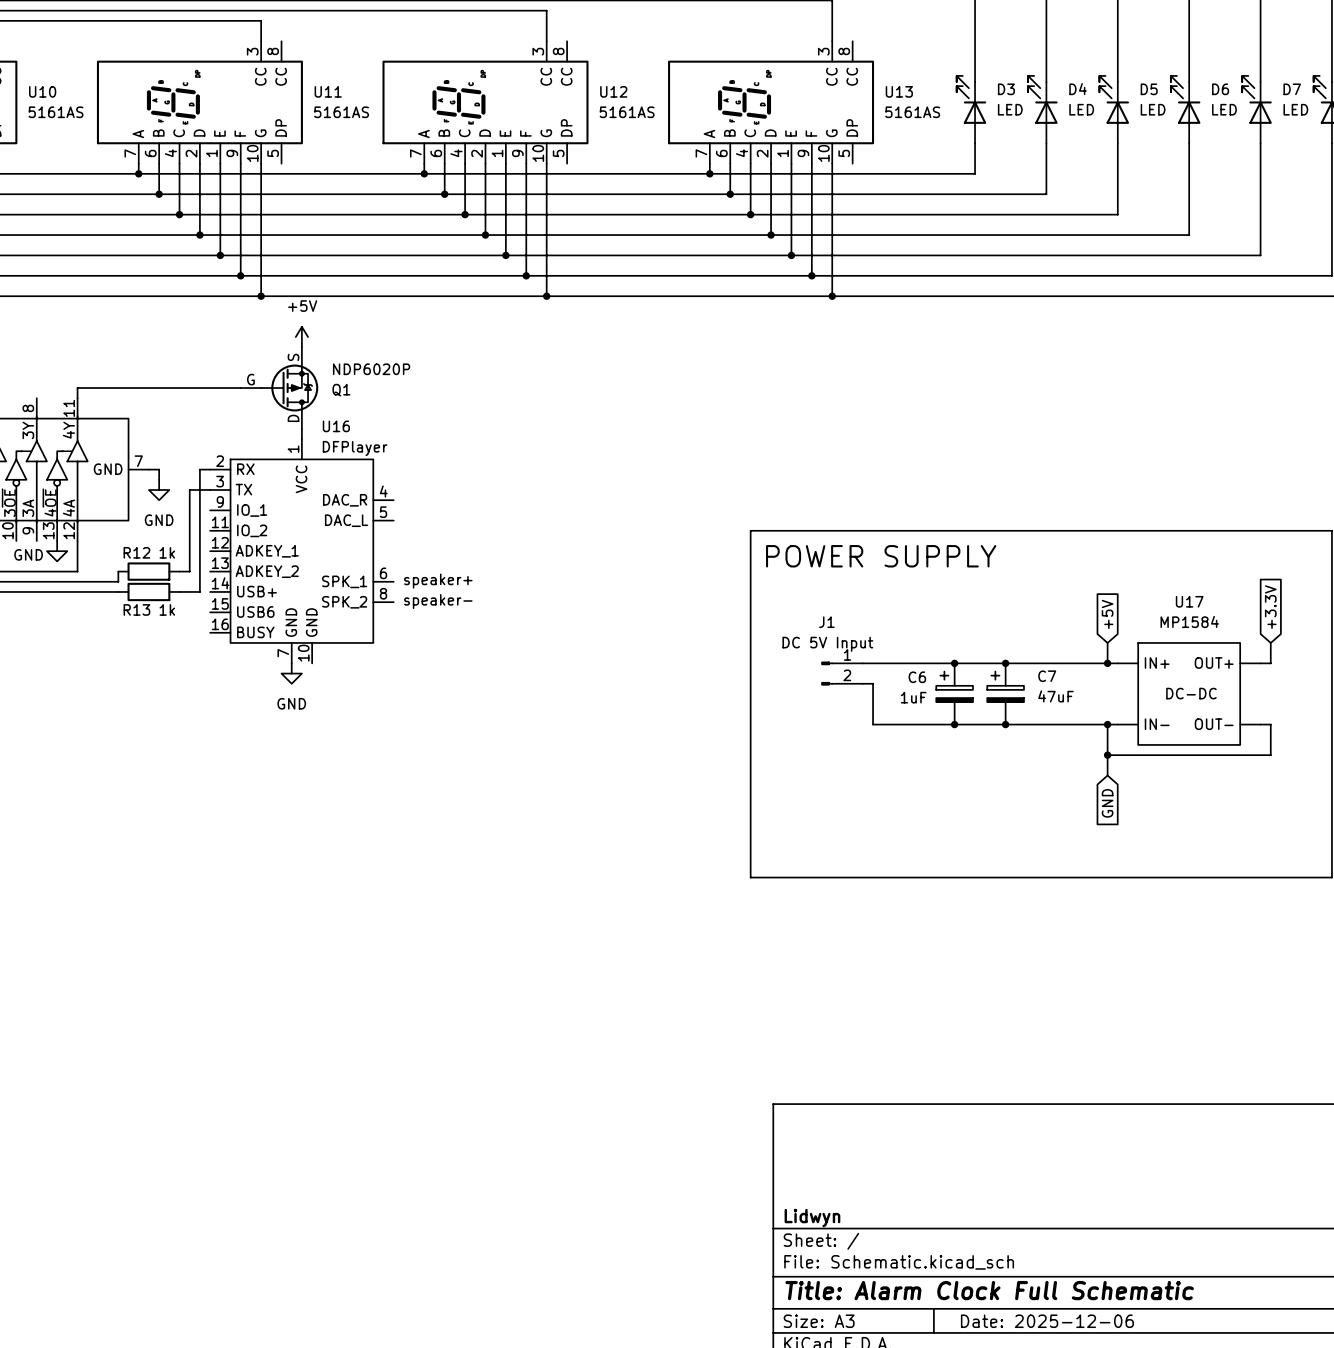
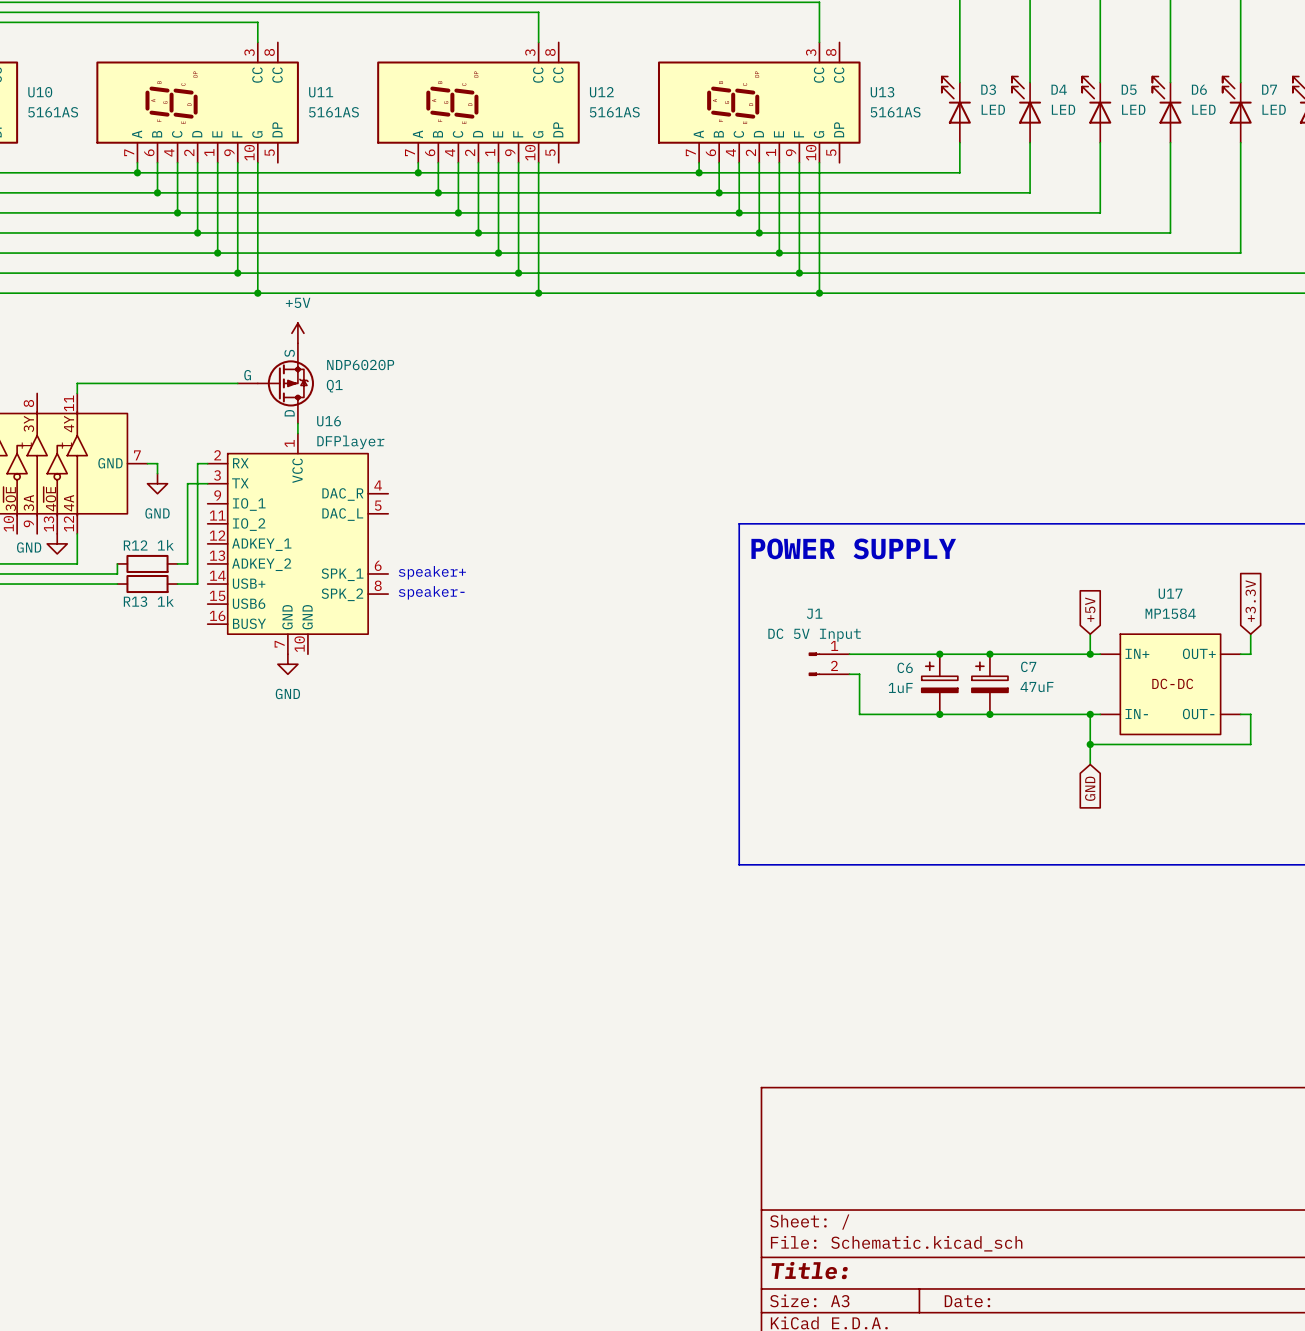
title block: Lidwyn (812, 1218) -> none
title block: Title: Alarm Clock Full Schematic (989, 1290) -> Title: (809, 1270)
title block: Date: 2025-12-06 (1047, 1321) -> Date: (967, 1301)

